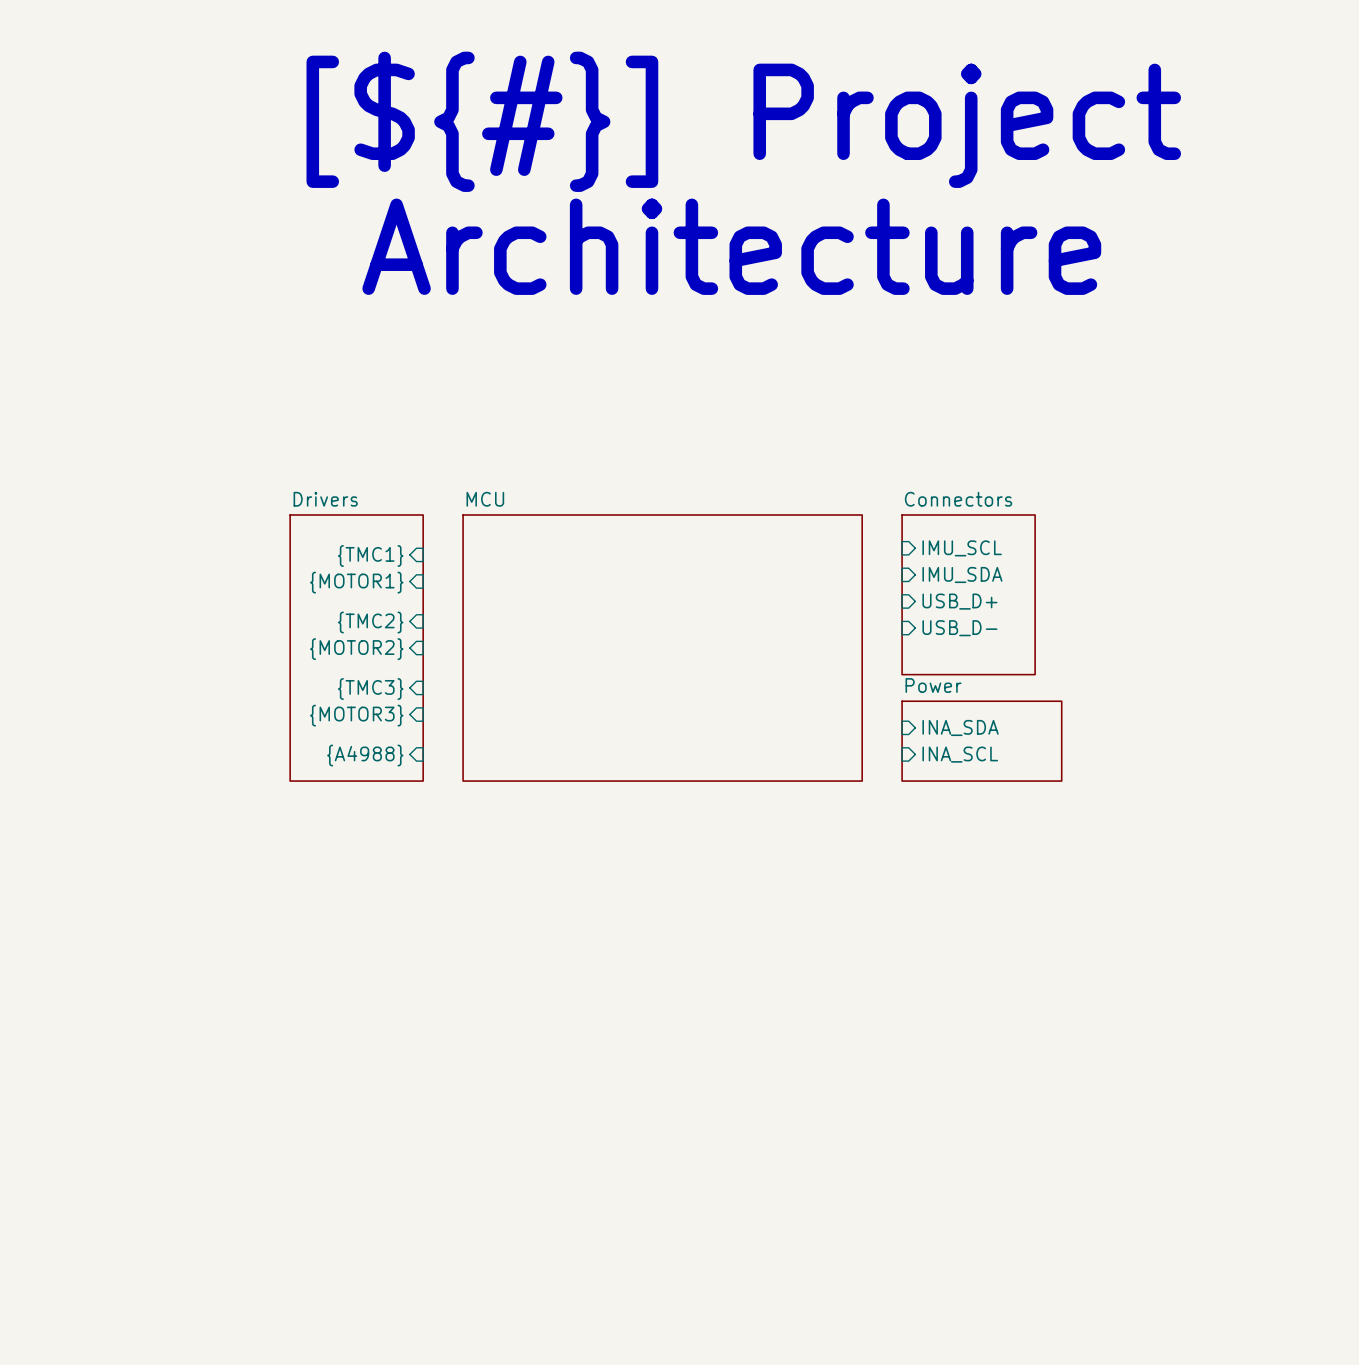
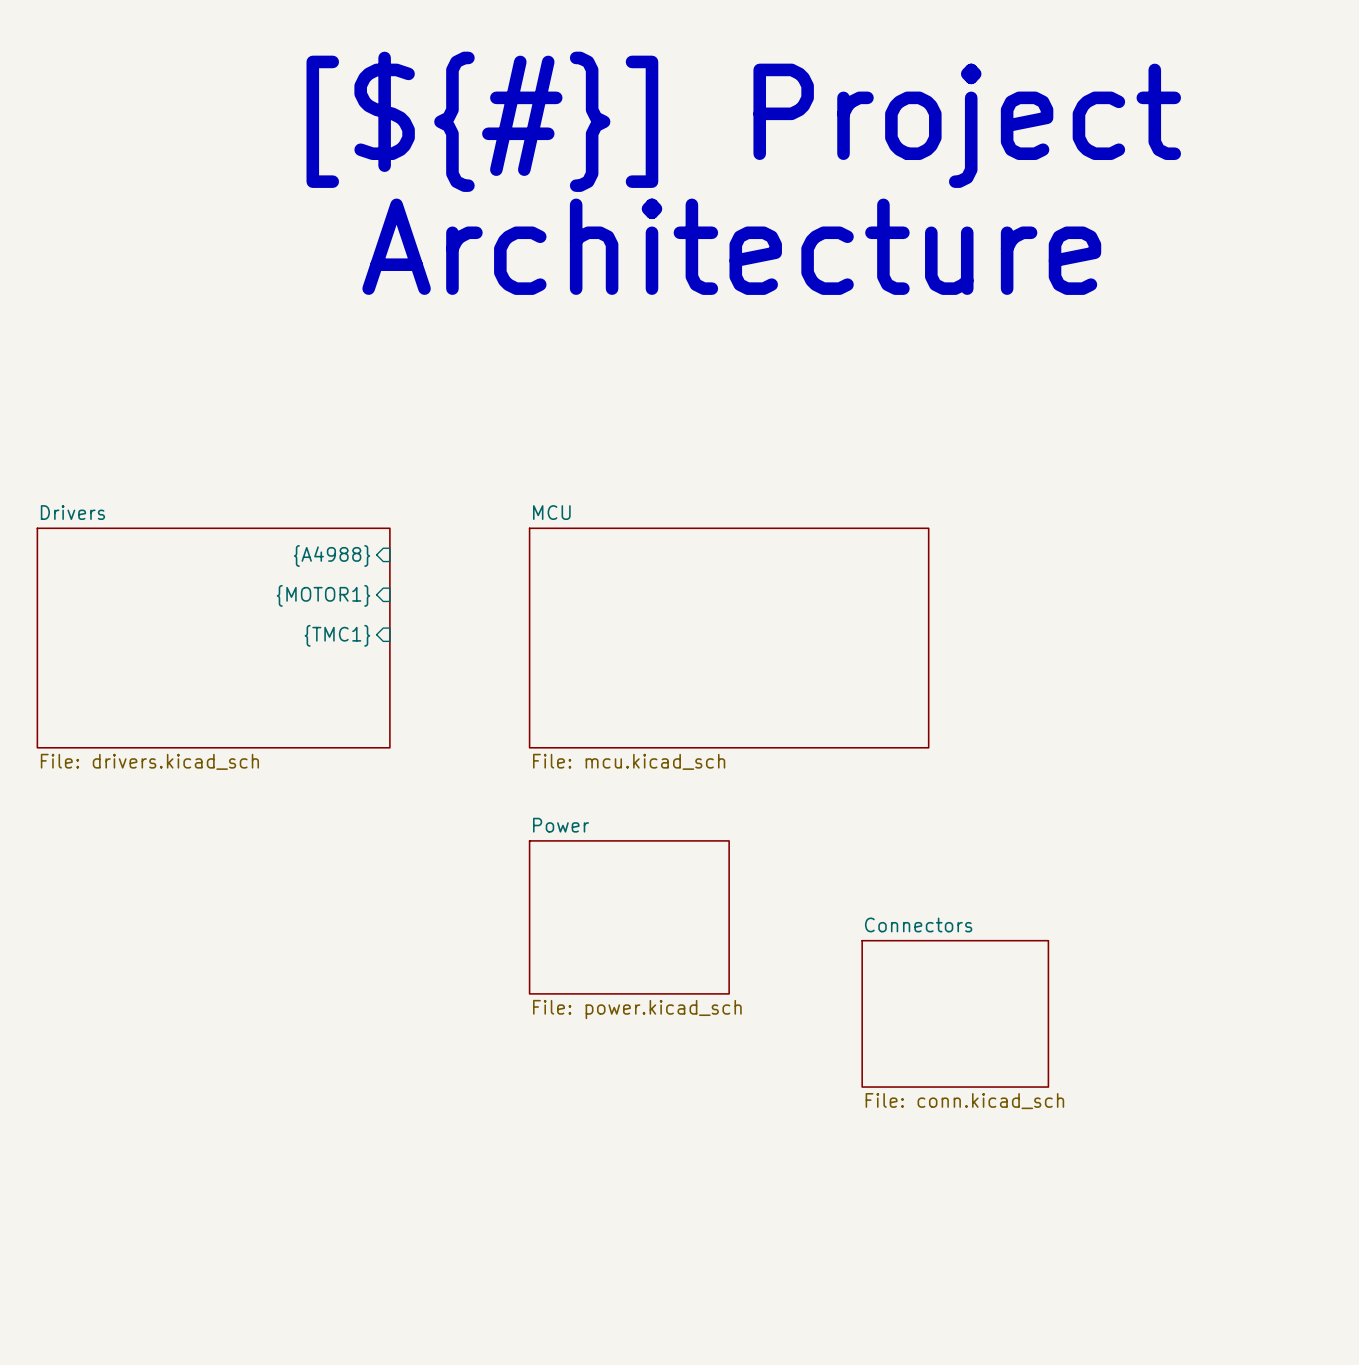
sheet pin: IMU_SCL (962, 548) -> none
sheet pin position: {TMC1} (370, 555) -> {TMC1} (337, 635)
sheet pin: IMU_SDA (962, 574) -> none
sheet pin position: {MOTOR1} (356, 582) -> {MOTOR1} (323, 595)
sheet Connectors: (968, 594) -> none
sheet pin: USB_D+ (959, 601) -> none
sheet pin: {TMC2} (370, 622) -> none
sheet pin: USB_D- (959, 628) -> none
sheet Drivers: none -> File: drivers.kicad_sch (213, 638)
sheet MCU: none -> File: mcu.kicad_sch (729, 638)
sheet Drivers: (356, 648) -> none
sheet MCU: (662, 648) -> none
sheet pin: {MOTOR2} (356, 649) -> none
sheet pin: {TMC3} (370, 689) -> none
sheet pin: {MOTOR3} (356, 715) -> none
sheet pin: INA_SDA (960, 727) -> none
sheet Power: (981, 741) -> none
sheet pin: INA_SCL (960, 754) -> none
sheet pin position: {A4988} (365, 755) -> {A4988} (332, 555)
sheet Power: none -> File: power.kicad_sch (629, 917)
sheet Connectors: none -> File: conn.kicad_sch (955, 1013)

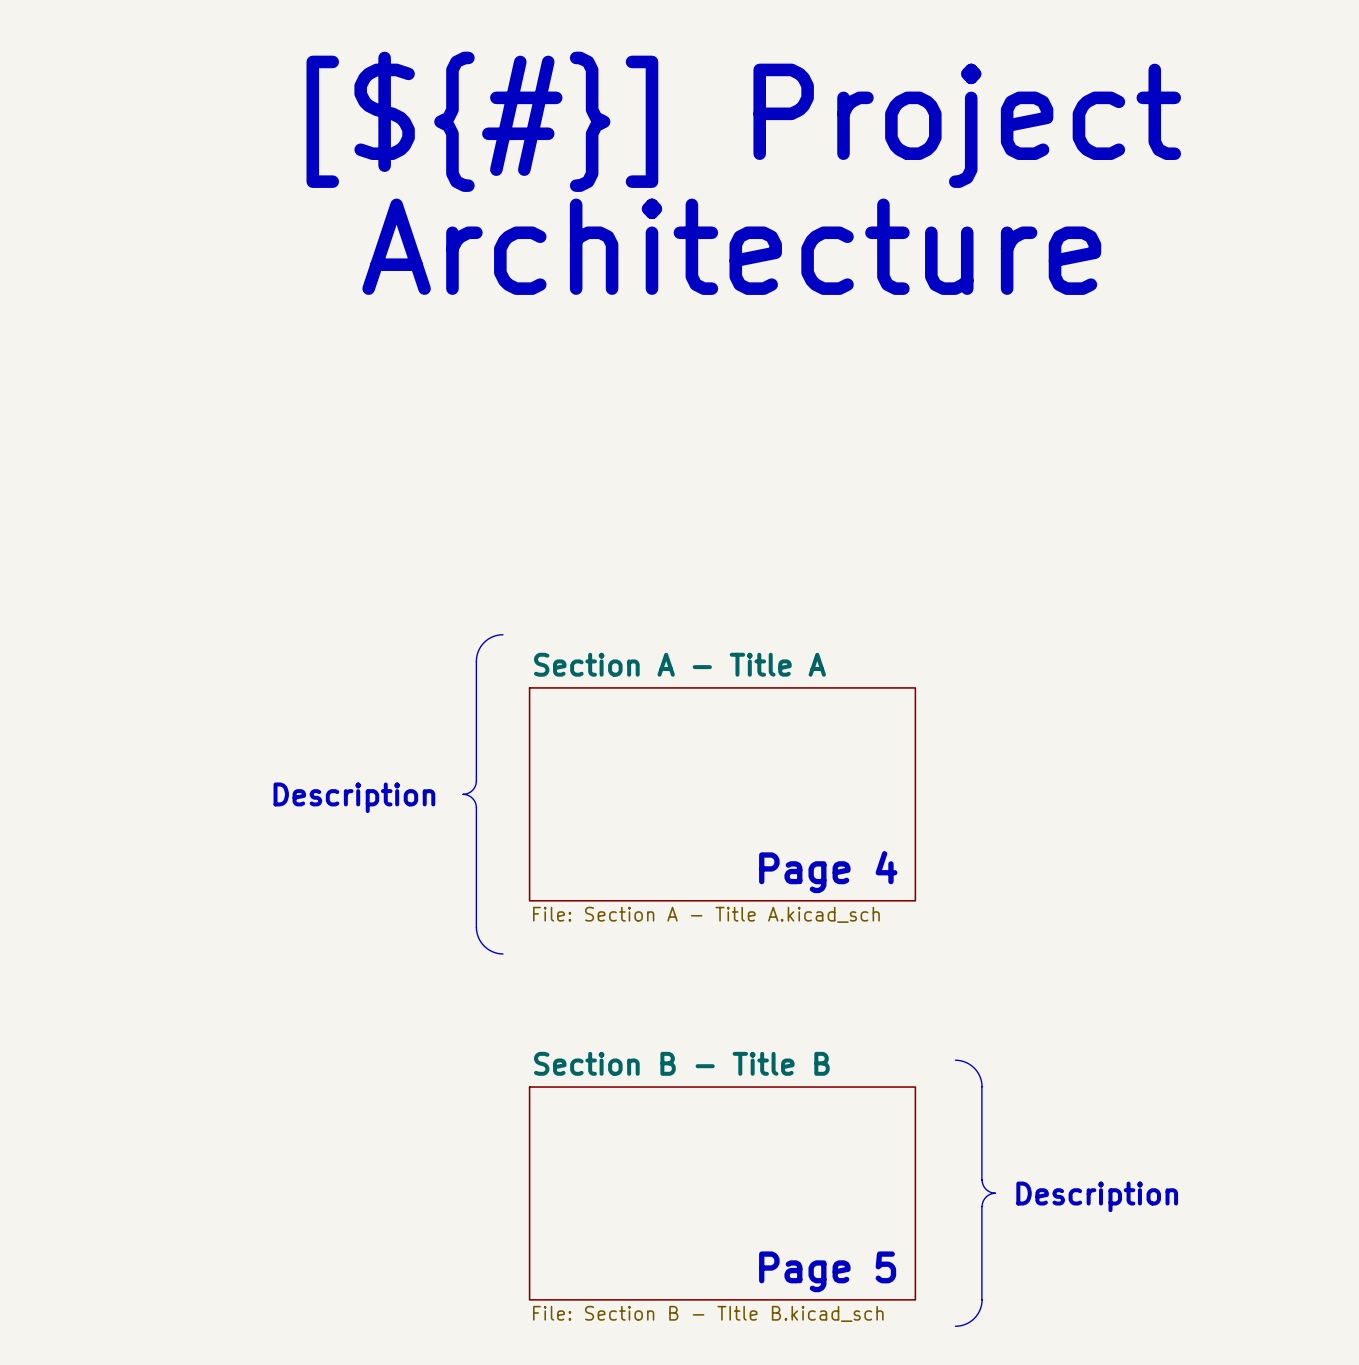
sheet pin: {A4988} (332, 555) -> none
sheet pin: {MOTOR1} (323, 595) -> none
line: none -> (502, 634) (486, 640) (477, 655) (476, 782) (471, 791) (463, 794) (471, 797) (476, 805) (477, 934) (486, 948) (502, 953)
sheet pin: {TMC1} (337, 635) -> none
sheet Drivers: File: drivers.kicad_sch (213, 638) -> none
sheet MCU: File: mcu.kicad_sch (729, 638) -> none
sheet Section A - Title A: none -> File: Section A - Title A.kicad_sch (722, 794)
text: none -> Description (354, 797)
text: none -> Page 4 (828, 872)
sheet Power: File: power.kicad_sch (629, 917) -> none
sheet Connectors: File: conn.kicad_sch (955, 1013) -> none
line: none -> (955, 1060) (965, 1062) (974, 1068) (980, 1076) (982, 1086)
line: none -> (981, 1087) (981, 1180)
line: none -> (982, 1179) (986, 1189) (995, 1193) (986, 1197) (982, 1206)
sheet Section B - Title B: none -> File: Section B - TItle B.kicad_sch (722, 1193)
text: none -> Description (1097, 1196)
line: none -> (981, 1206) (981, 1299)
text: none -> Page 5 (827, 1271)
line: none -> (982, 1299) (980, 1308) (974, 1318) (964, 1324) (955, 1326)

